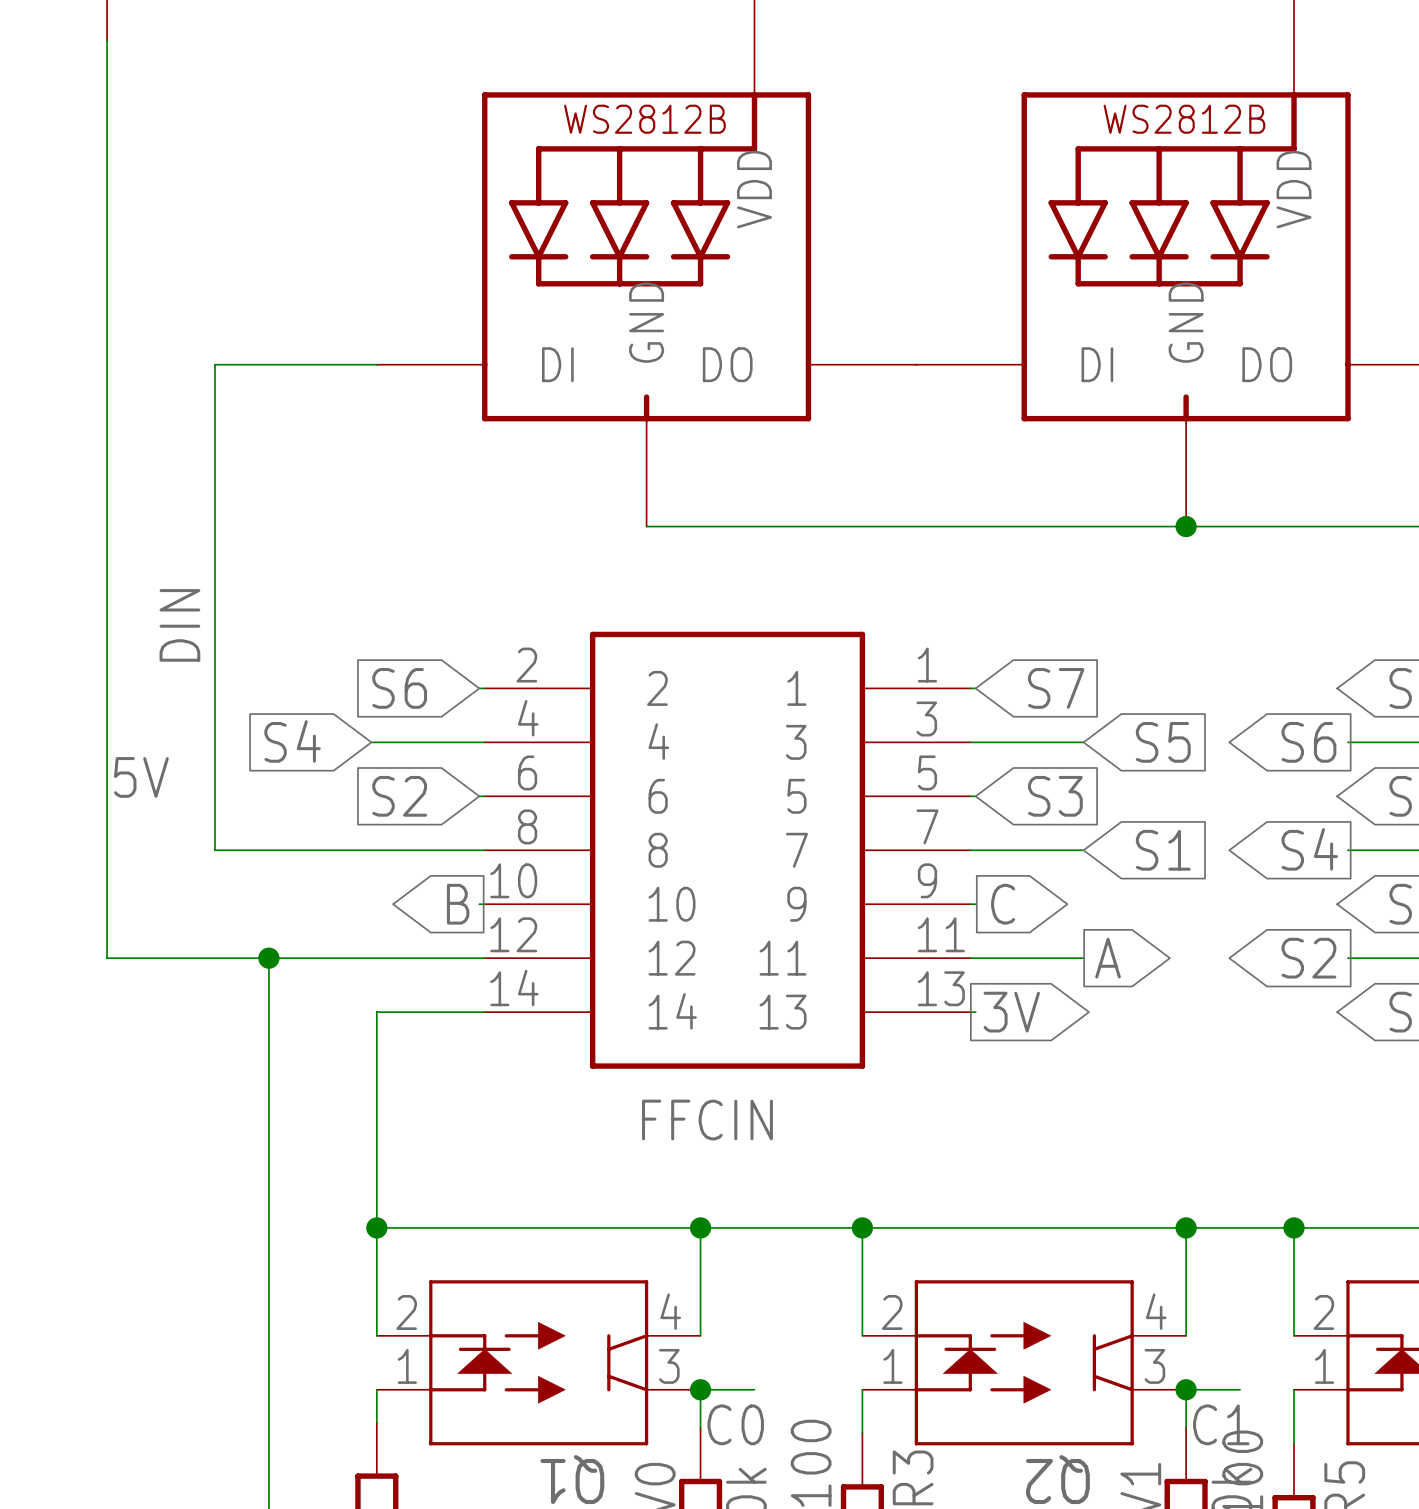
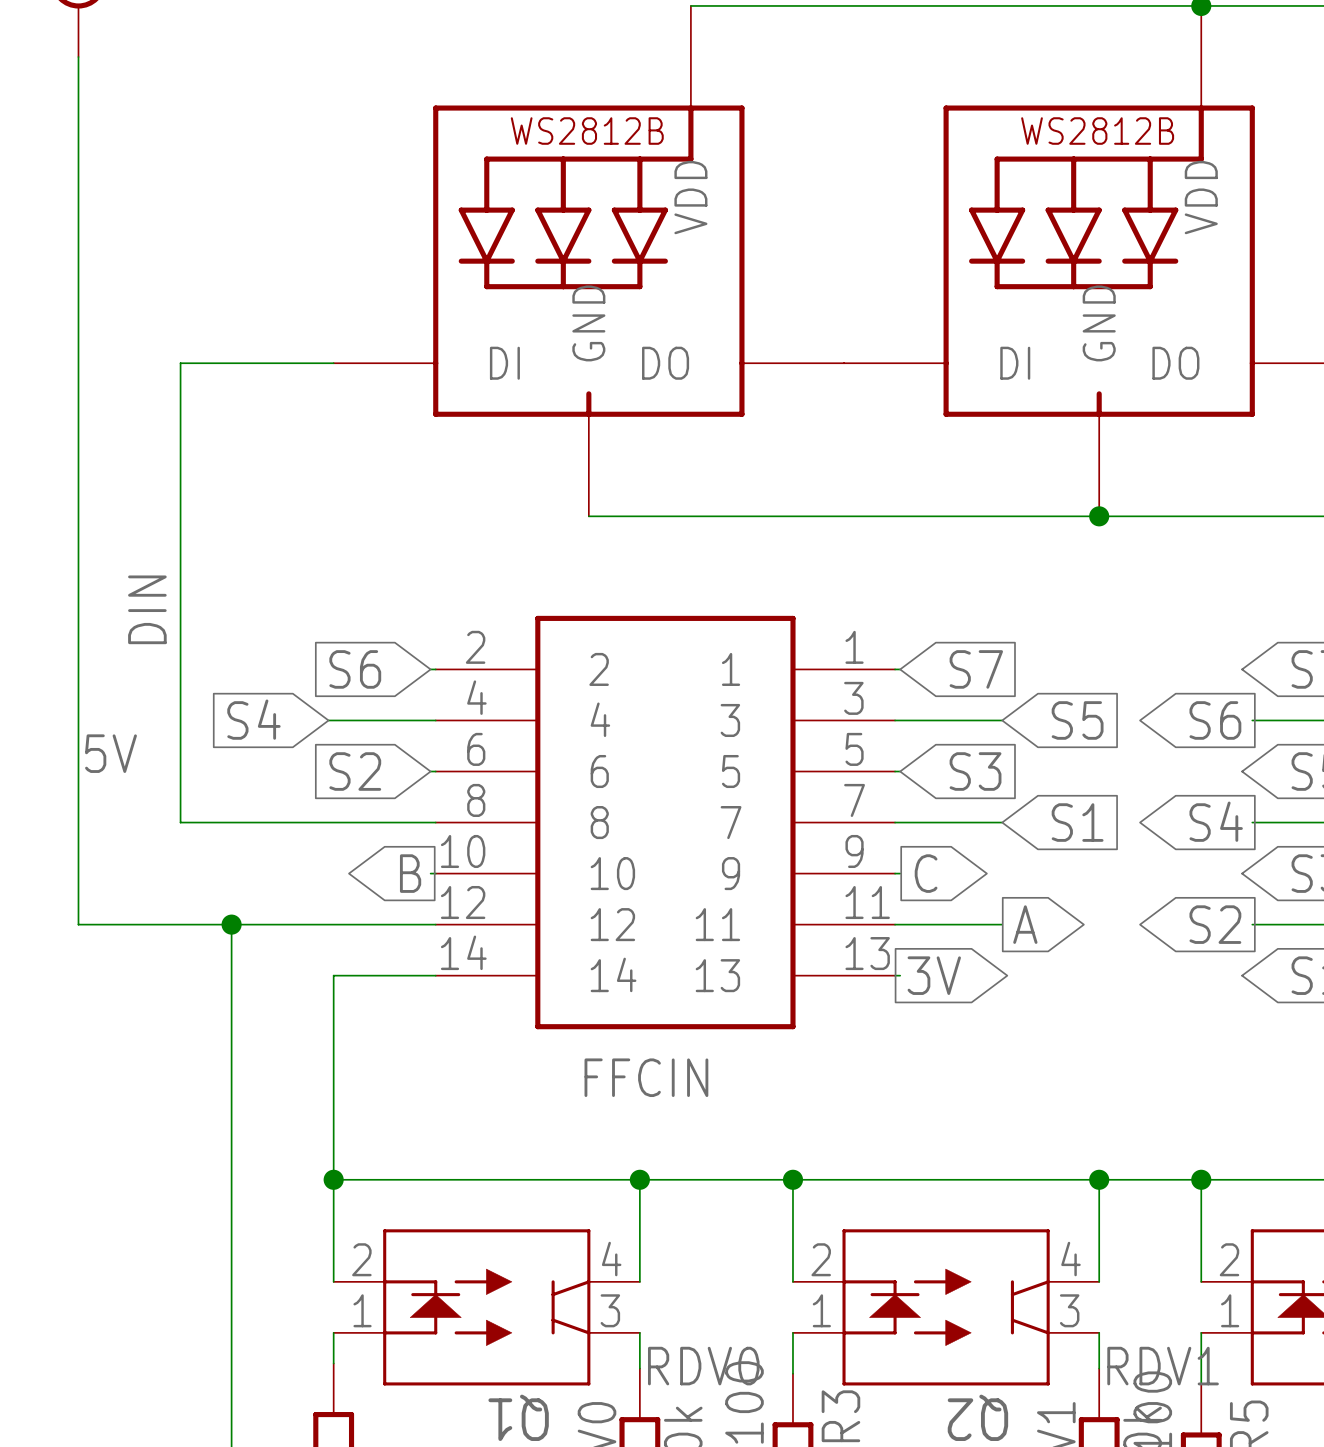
wire: (700, 1389) (754, 1389) -> none
junction: (700, 1389) -> none
wire: (1186, 1389) (1240, 1389) -> none
junction: (1186, 1389) -> none
label: C0 (735, 1424) -> RDV0 (703, 1366)
label: C1 (1221, 1424) -> RDV1 (1163, 1366)

